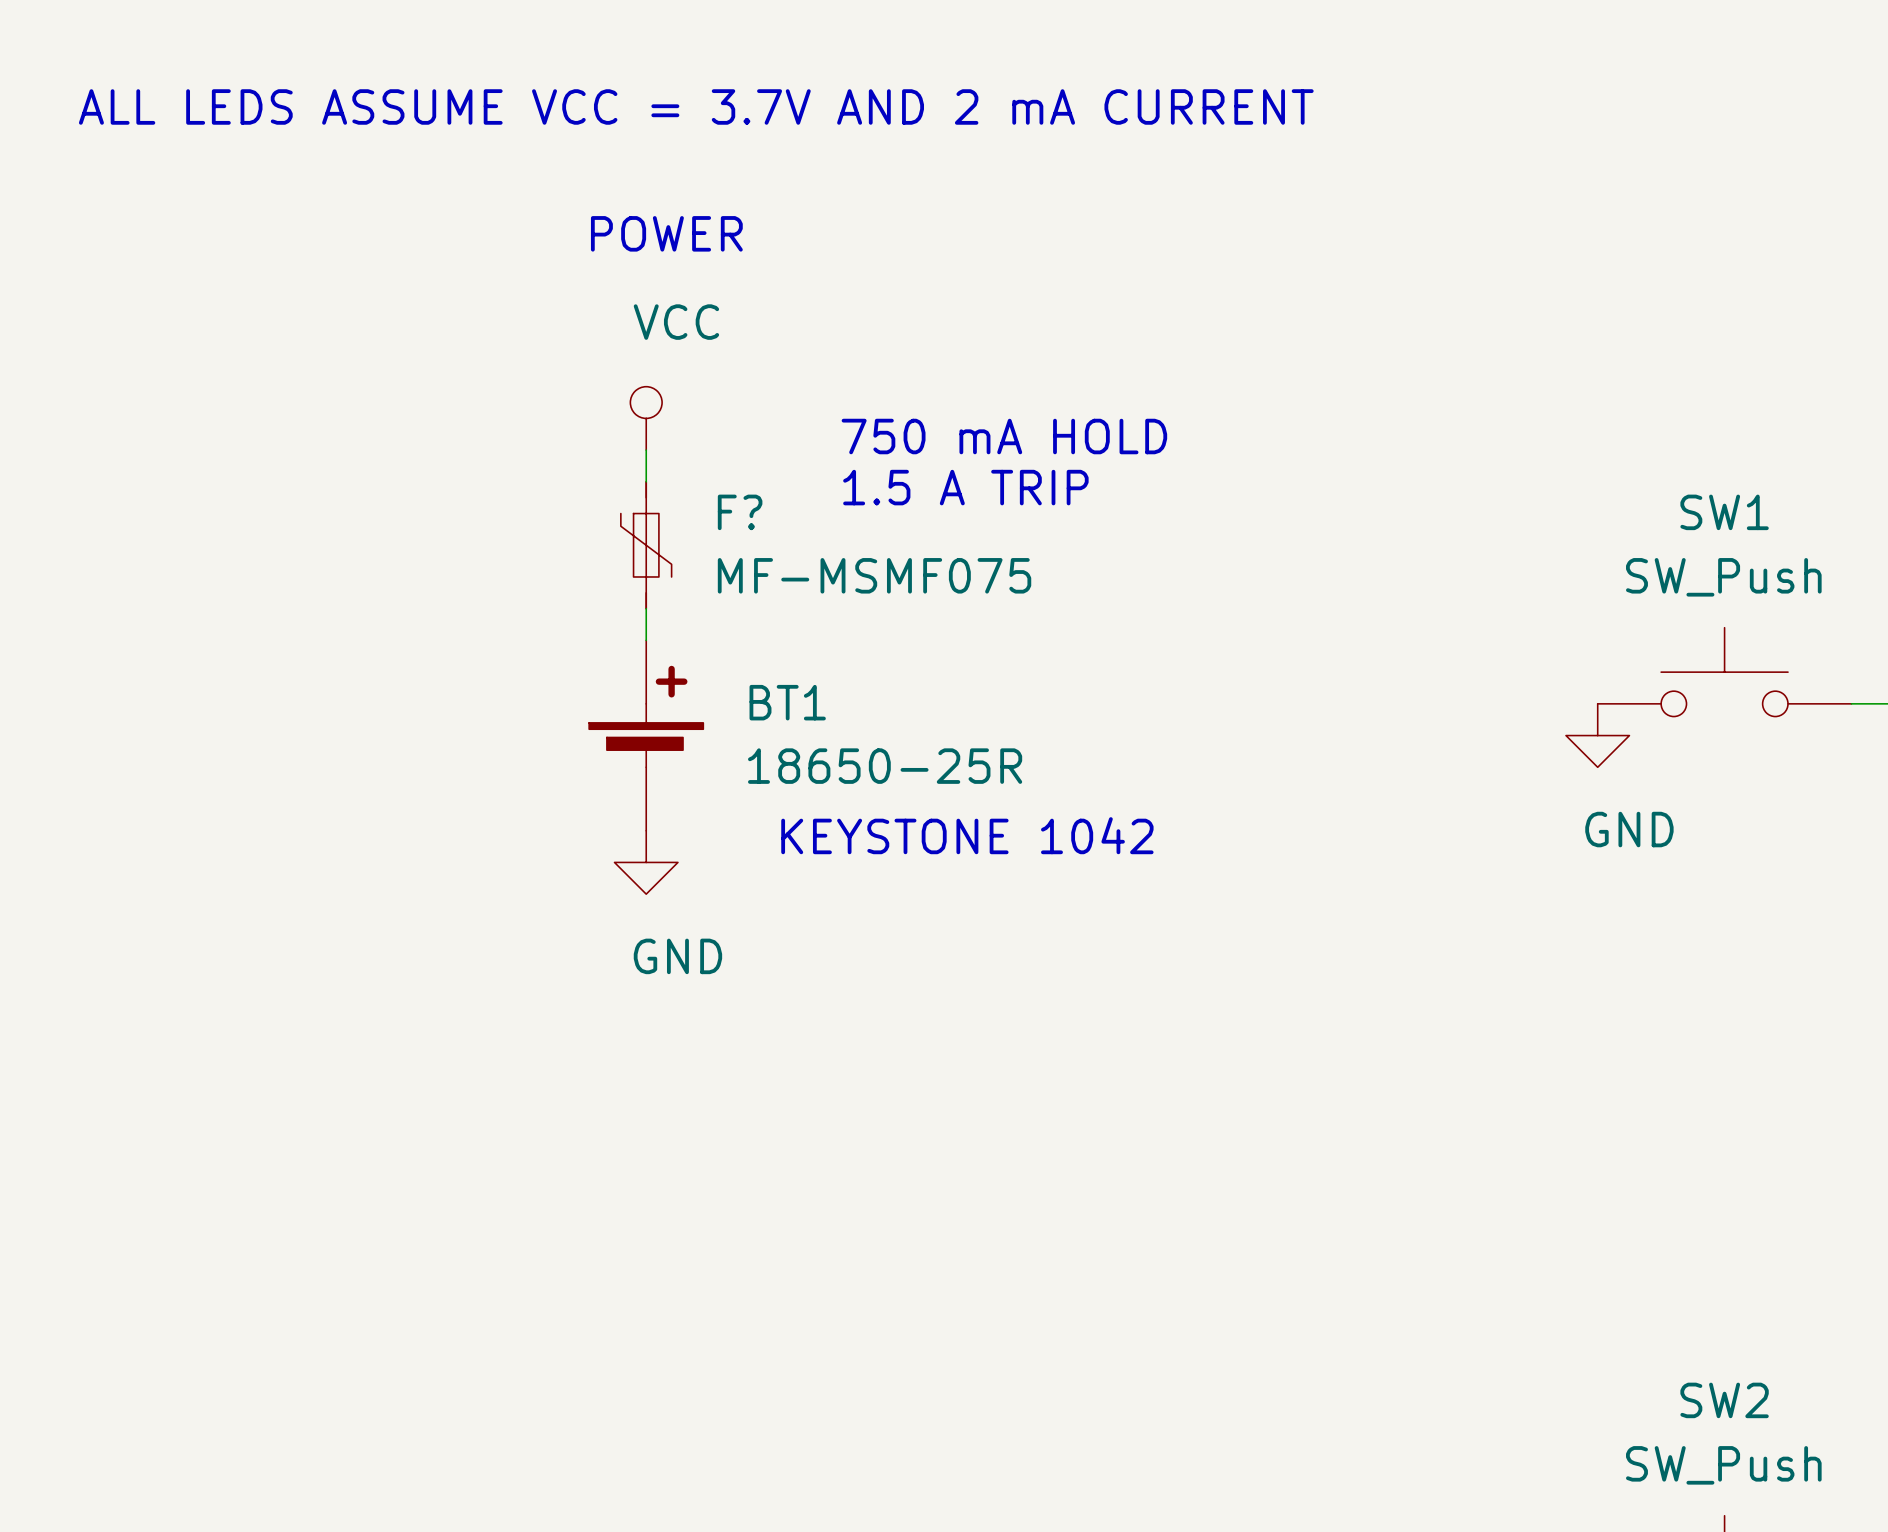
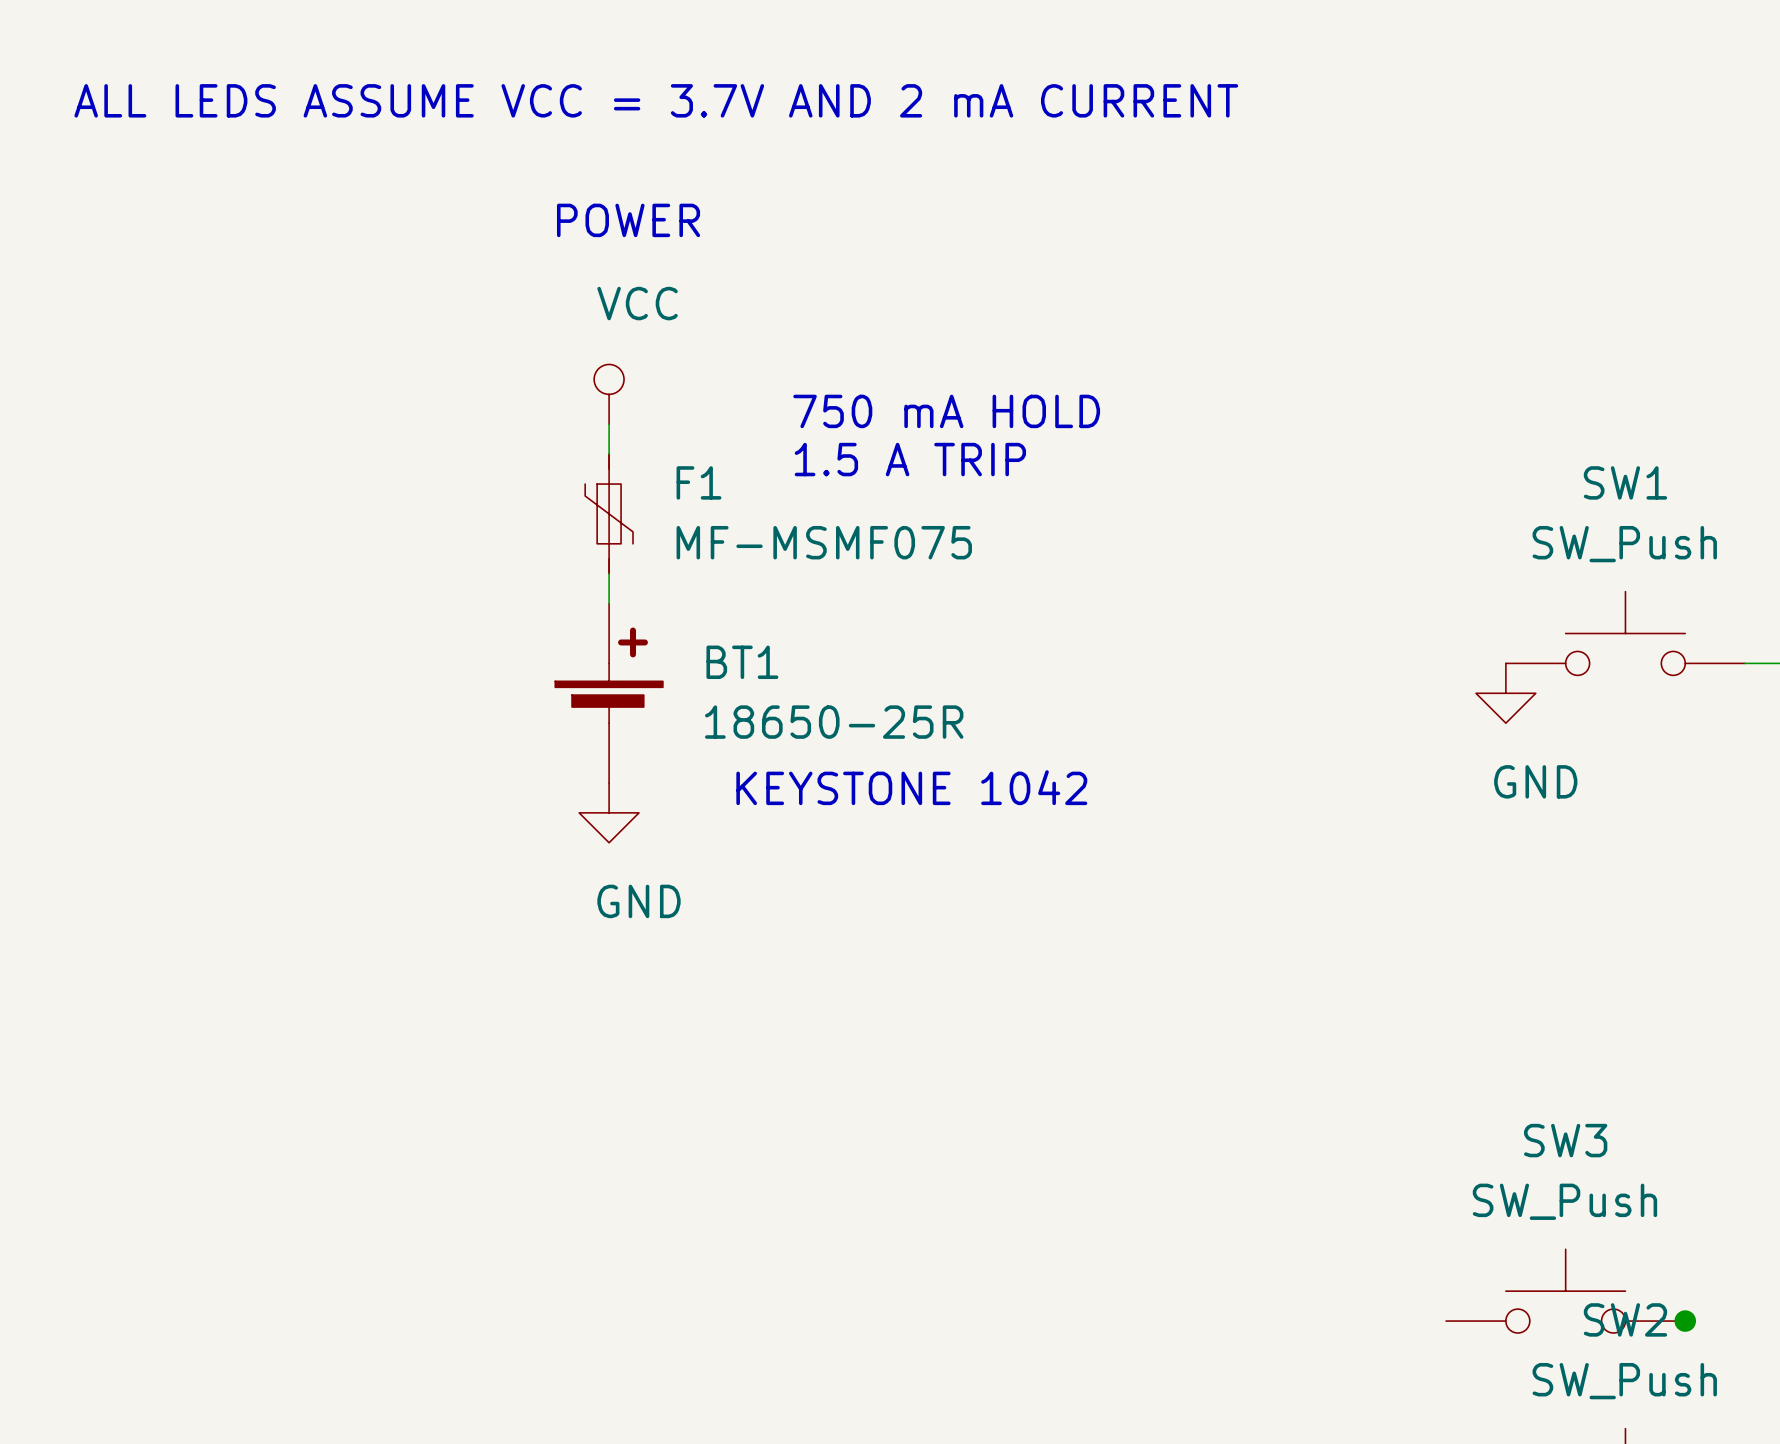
F? name: F? (740, 512) -> F1 (698, 482)
SW3: none -> SW_Push (1565, 1291)
junction: none -> (1685, 1321)

